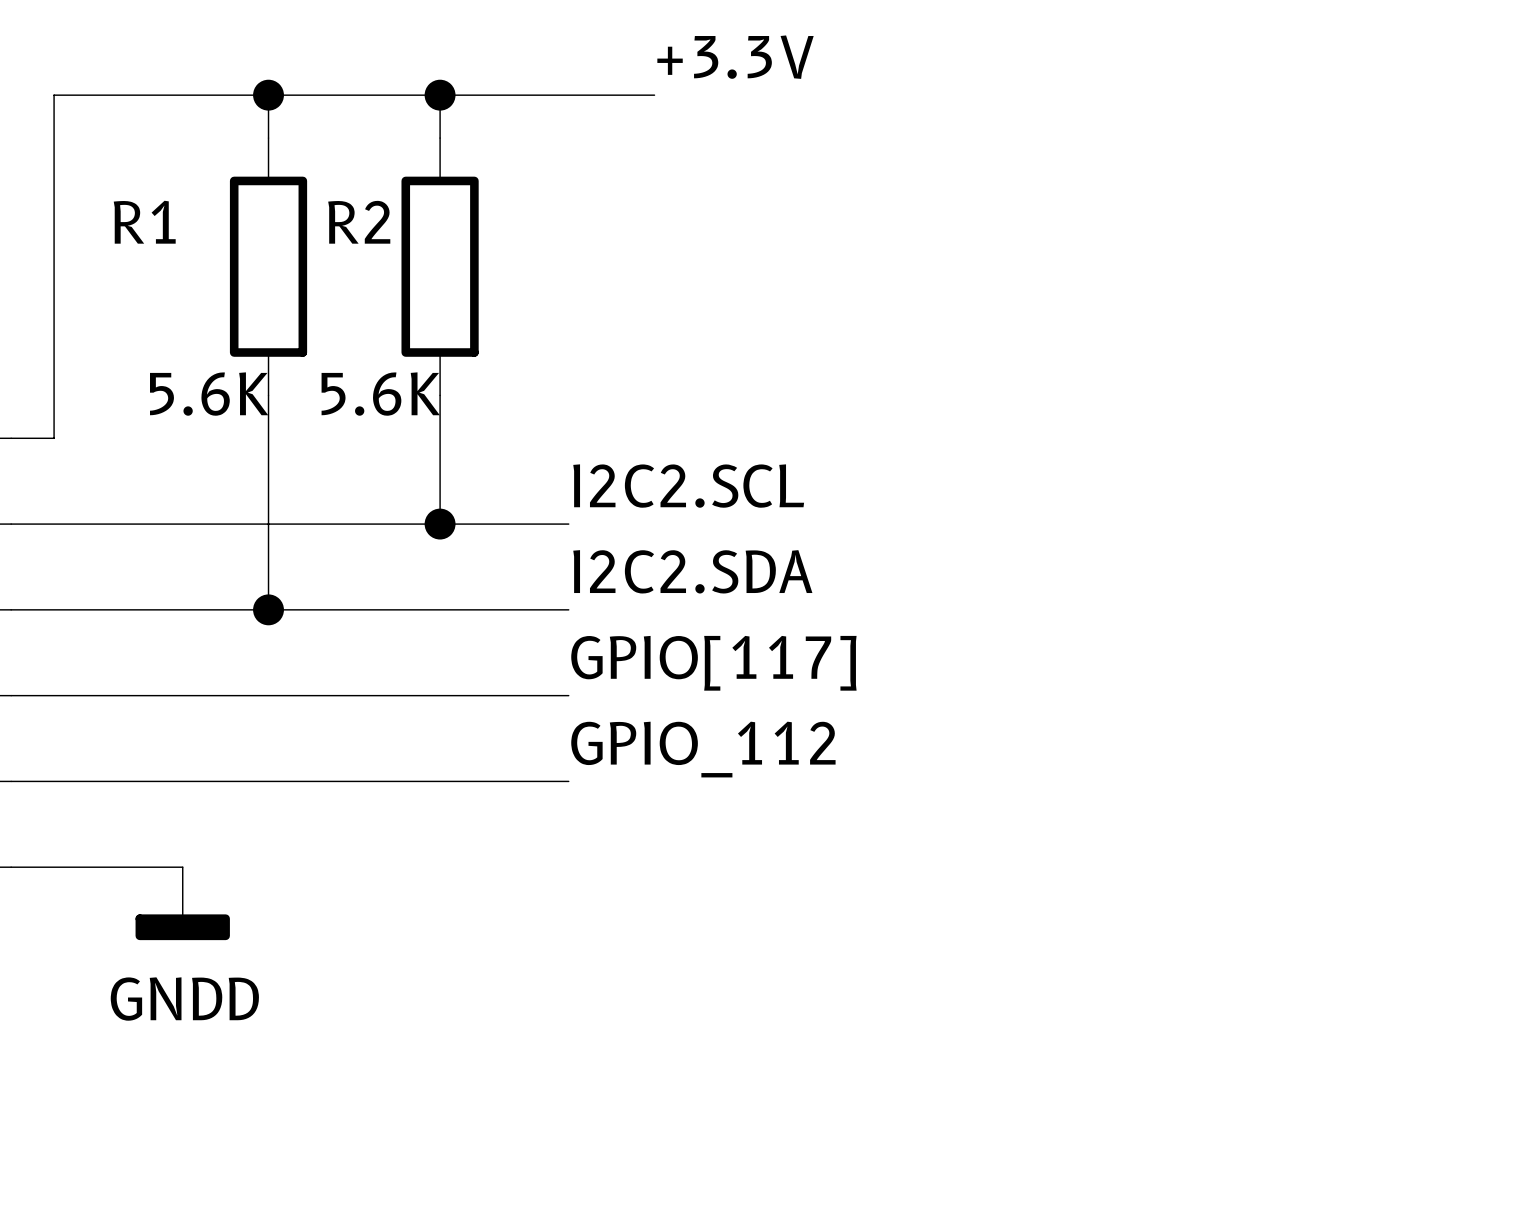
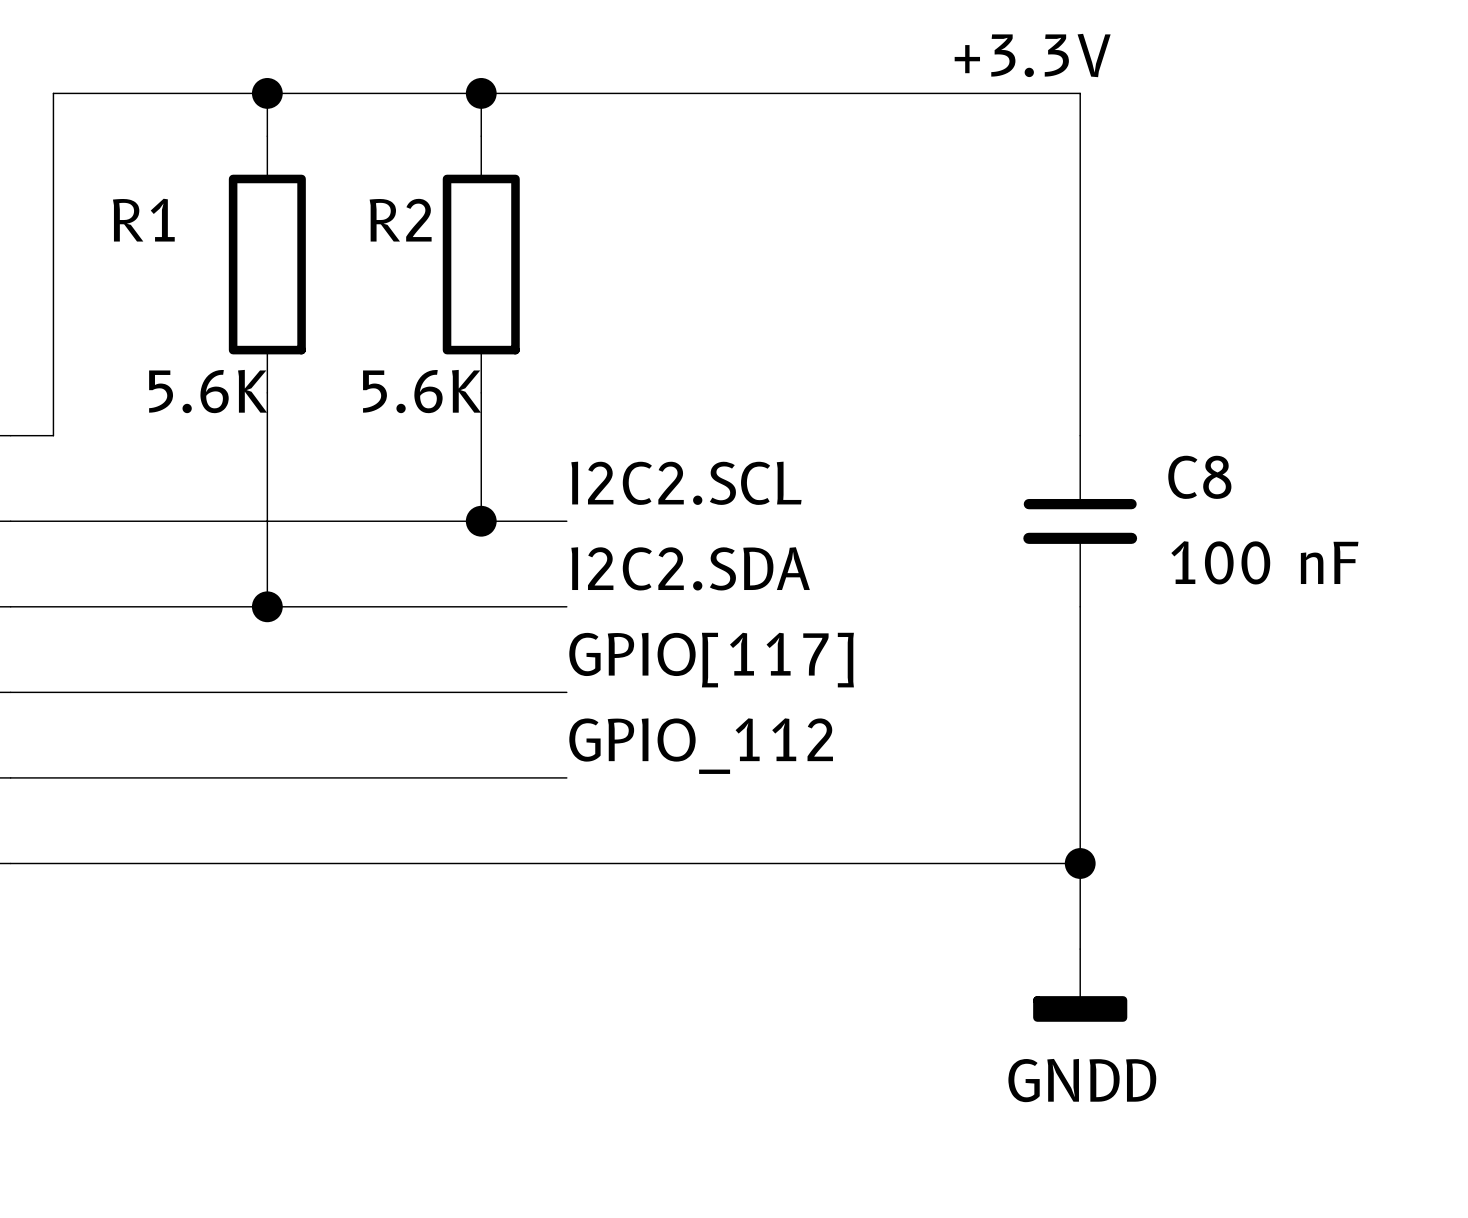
label position: +3.3V (735, 57) -> +3.3V (1032, 55)
wire: (440, 95) (440, 138) -> (481, 93) (481, 136)
junction position: (440, 95) -> (481, 93)
wire: none -> (652, 93) (1080, 93) (1080, 435)
R2 position: (440, 266) -> (481, 264)
wire: (440, 395) (440, 524) -> (481, 392) (481, 521)
junction position: (440, 524) -> (481, 521)
C8: none -> 100 nF (1080, 521)
wire: none -> (1080, 606) (1080, 949)
wire: none -> (181, 863) (1080, 863)
junction: none -> (1080, 863)
power symbol: GNDD (182, 903) -> none
power symbol: none -> GNDD (1080, 985)

